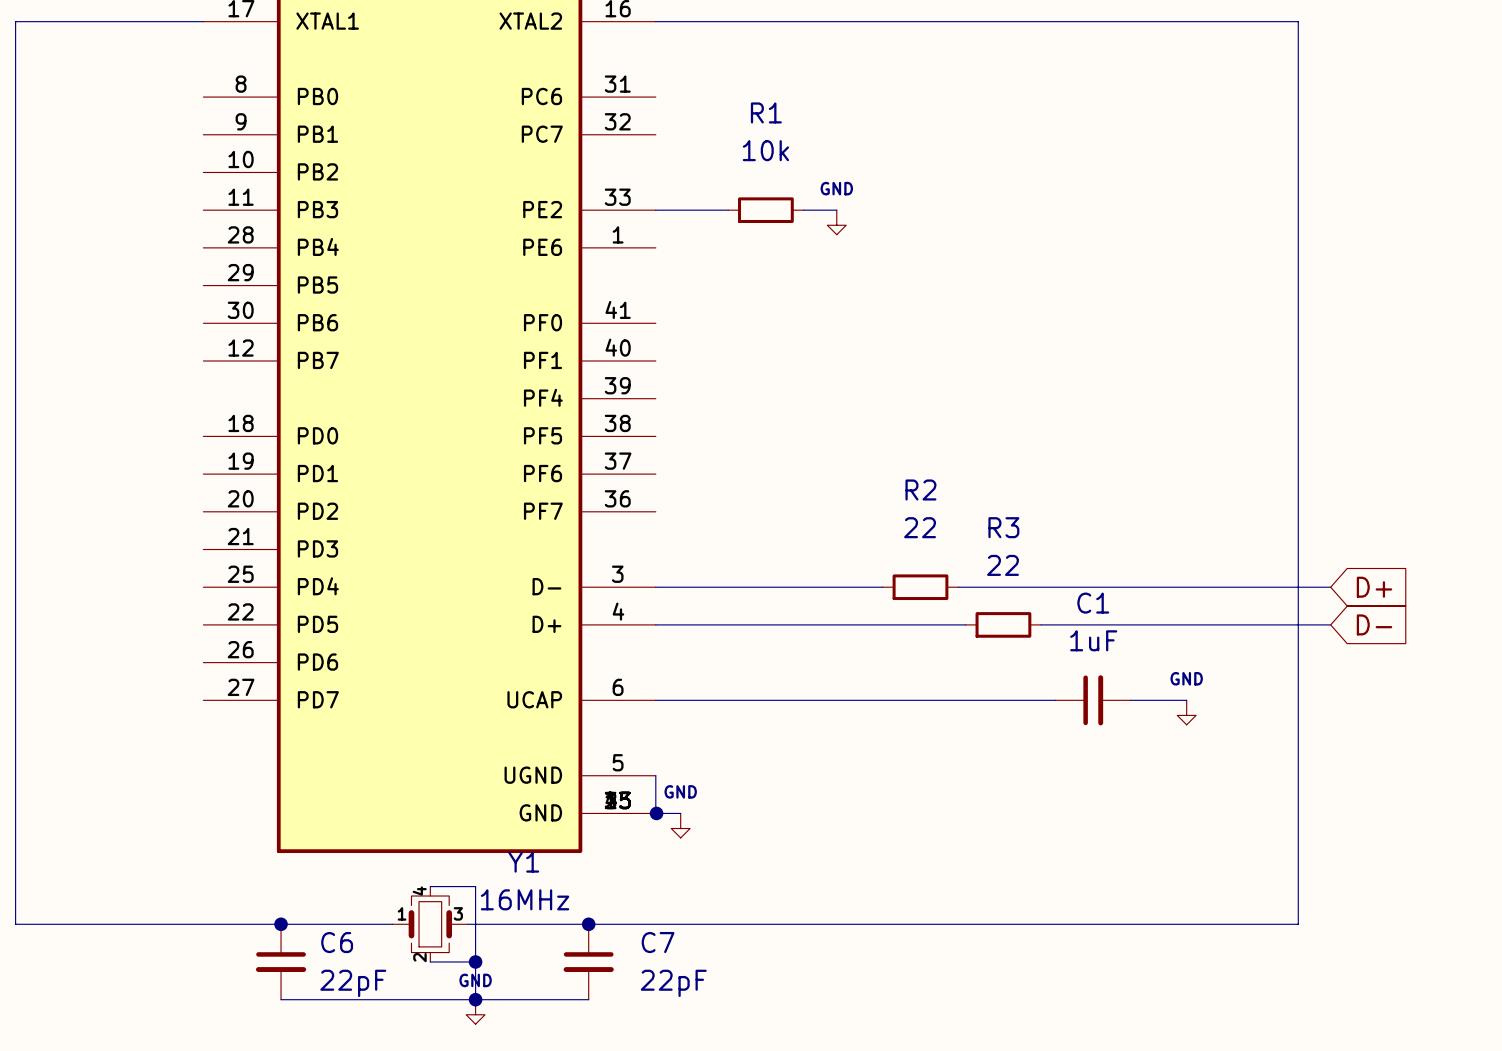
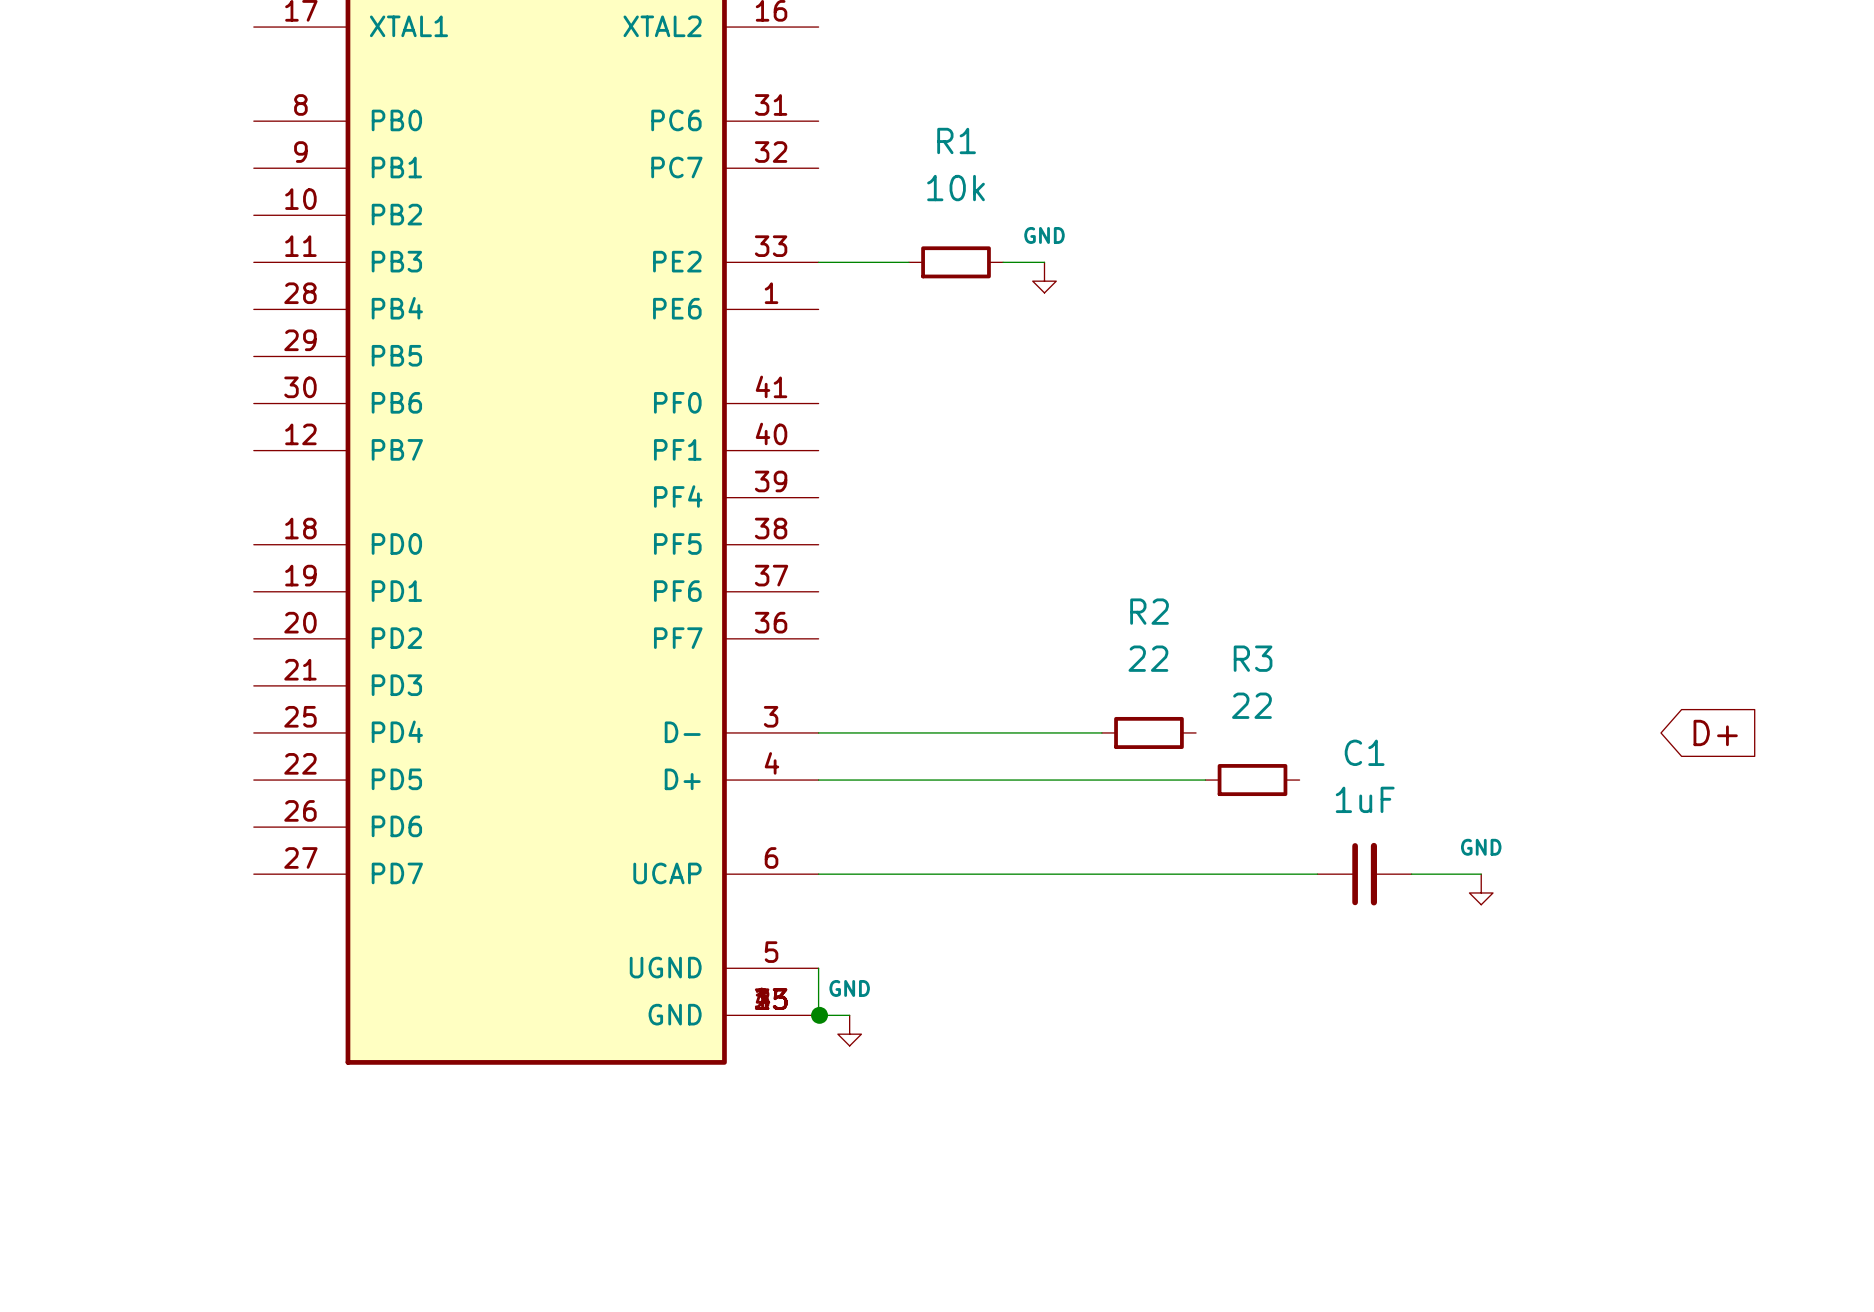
wire: (203, 21) (15, 21) (15, 924) (392, 924) -> none
wire: (655, 21) (1298, 21) (1298, 924) (468, 924) -> none
wire: (958, 587) (1330, 587) -> none
wire: (1041, 624) (1330, 624) -> none
global label: D- (1374, 624) -> none
wire: (430, 886) (475, 886) (475, 999) -> none
junction: (281, 924) -> none
Y1: 16MHz (430, 924) -> none
junction: (588, 924) -> none
C6: 22pF (281, 961) -> none
wire: (430, 961) (475, 961) -> none
junction: (475, 961) -> none
C7: 22pF (588, 961) -> none
wire: (281, 999) (588, 999) -> none
junction: (475, 999) -> none
power symbol: GND (475, 1011) -> none

